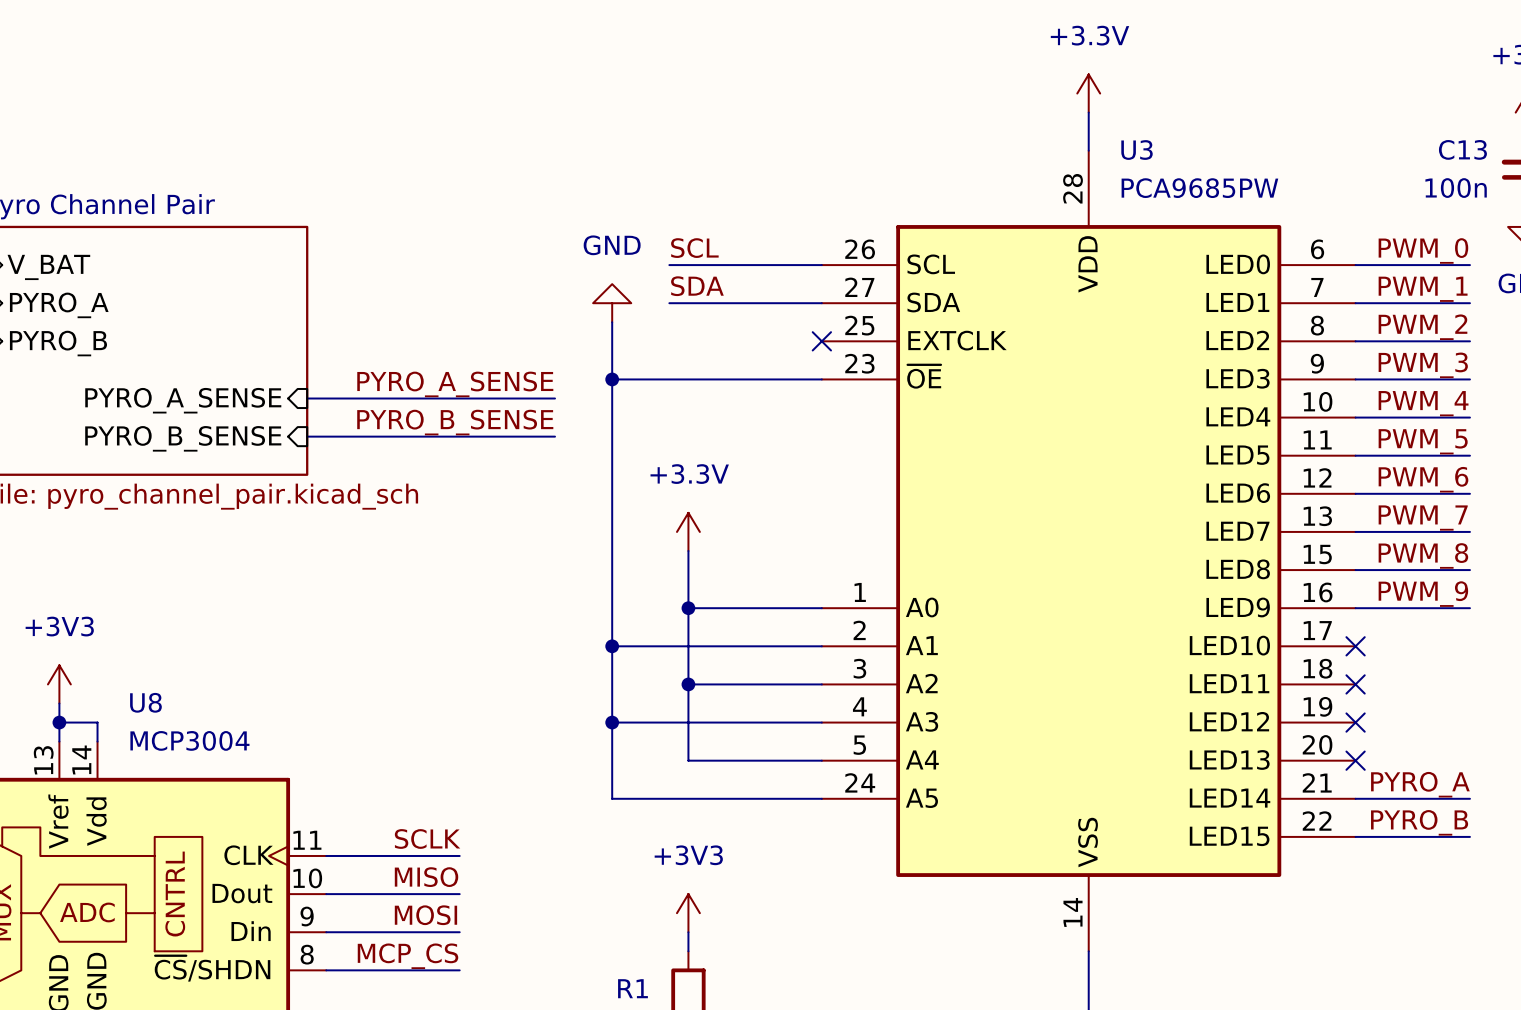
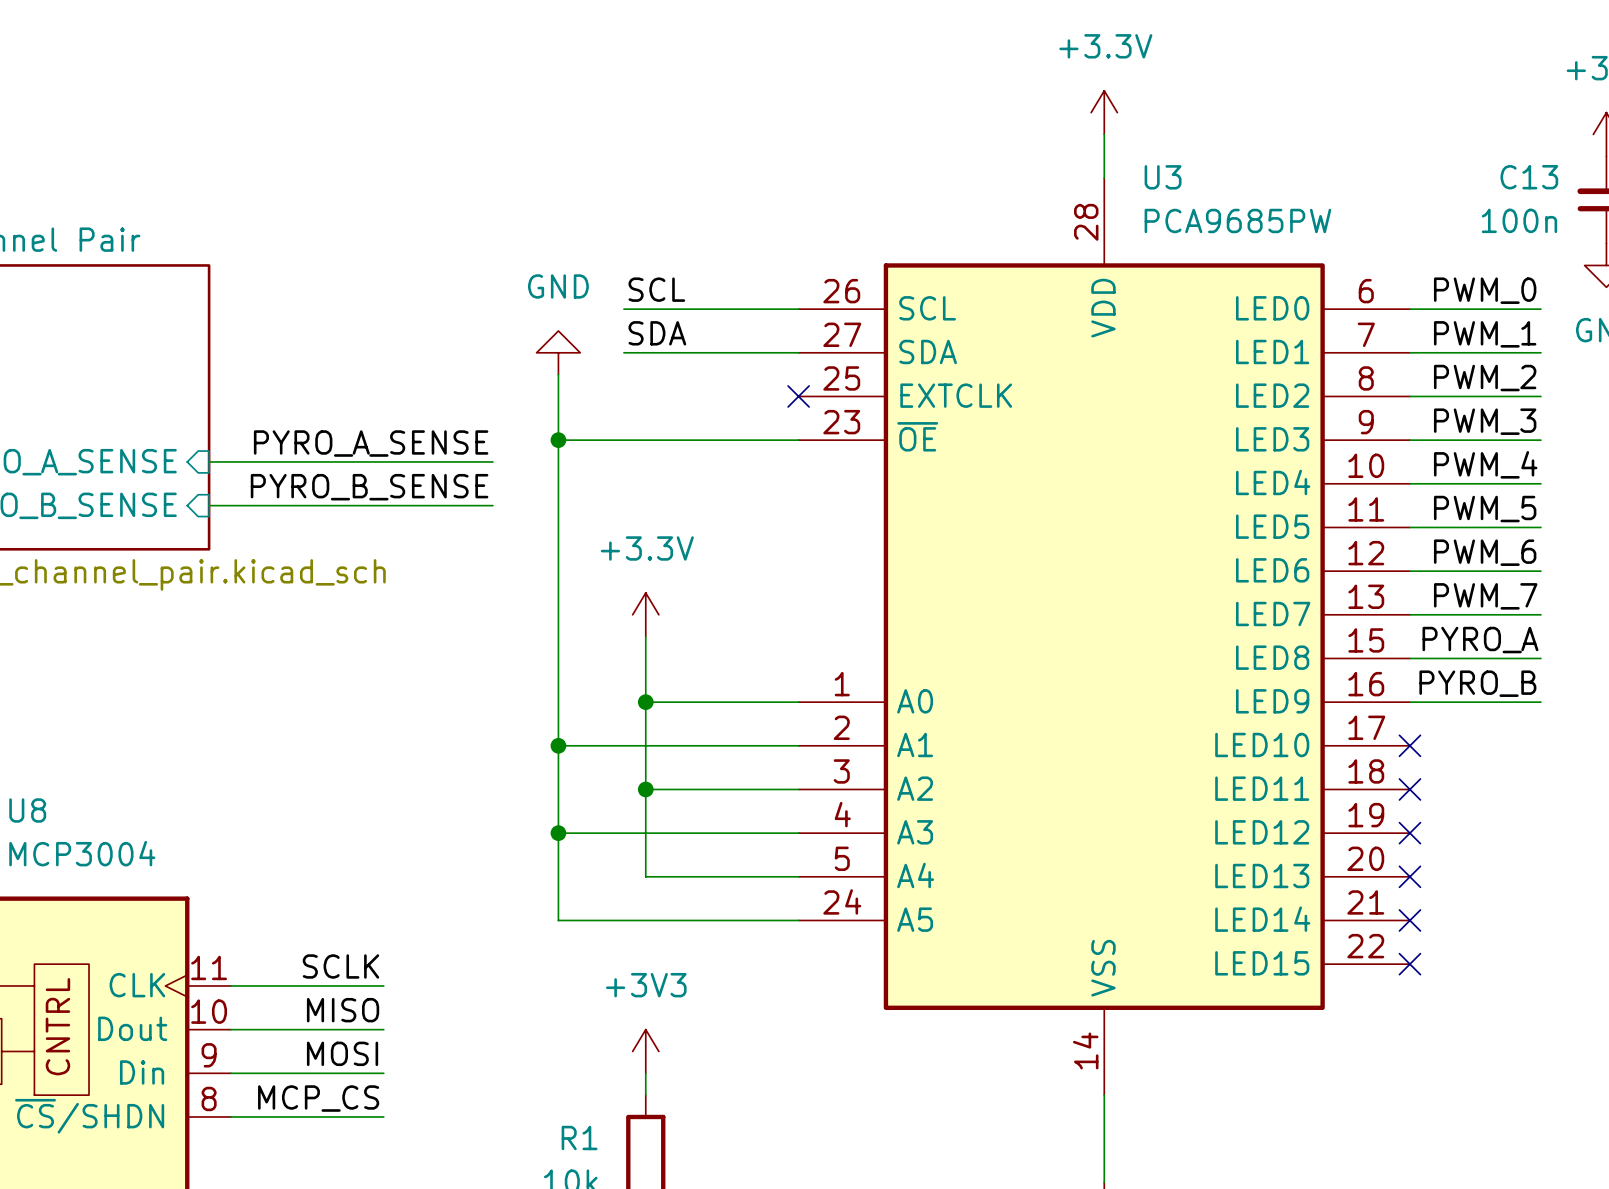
label: PWM_8 (1423, 555) -> PYRO_A (1480, 640)
label: PWM_9 (1423, 594) -> PYRO_B (1477, 683)
label: PYRO_A (1420, 784) -> none
wire: (1355, 798) (1469, 798) -> none
no-connect mark: none -> (1409, 920)
label: PYRO_B (1419, 822) -> none
wire: (1355, 836) (1469, 836) -> none
no-connect mark: none -> (1409, 964)

